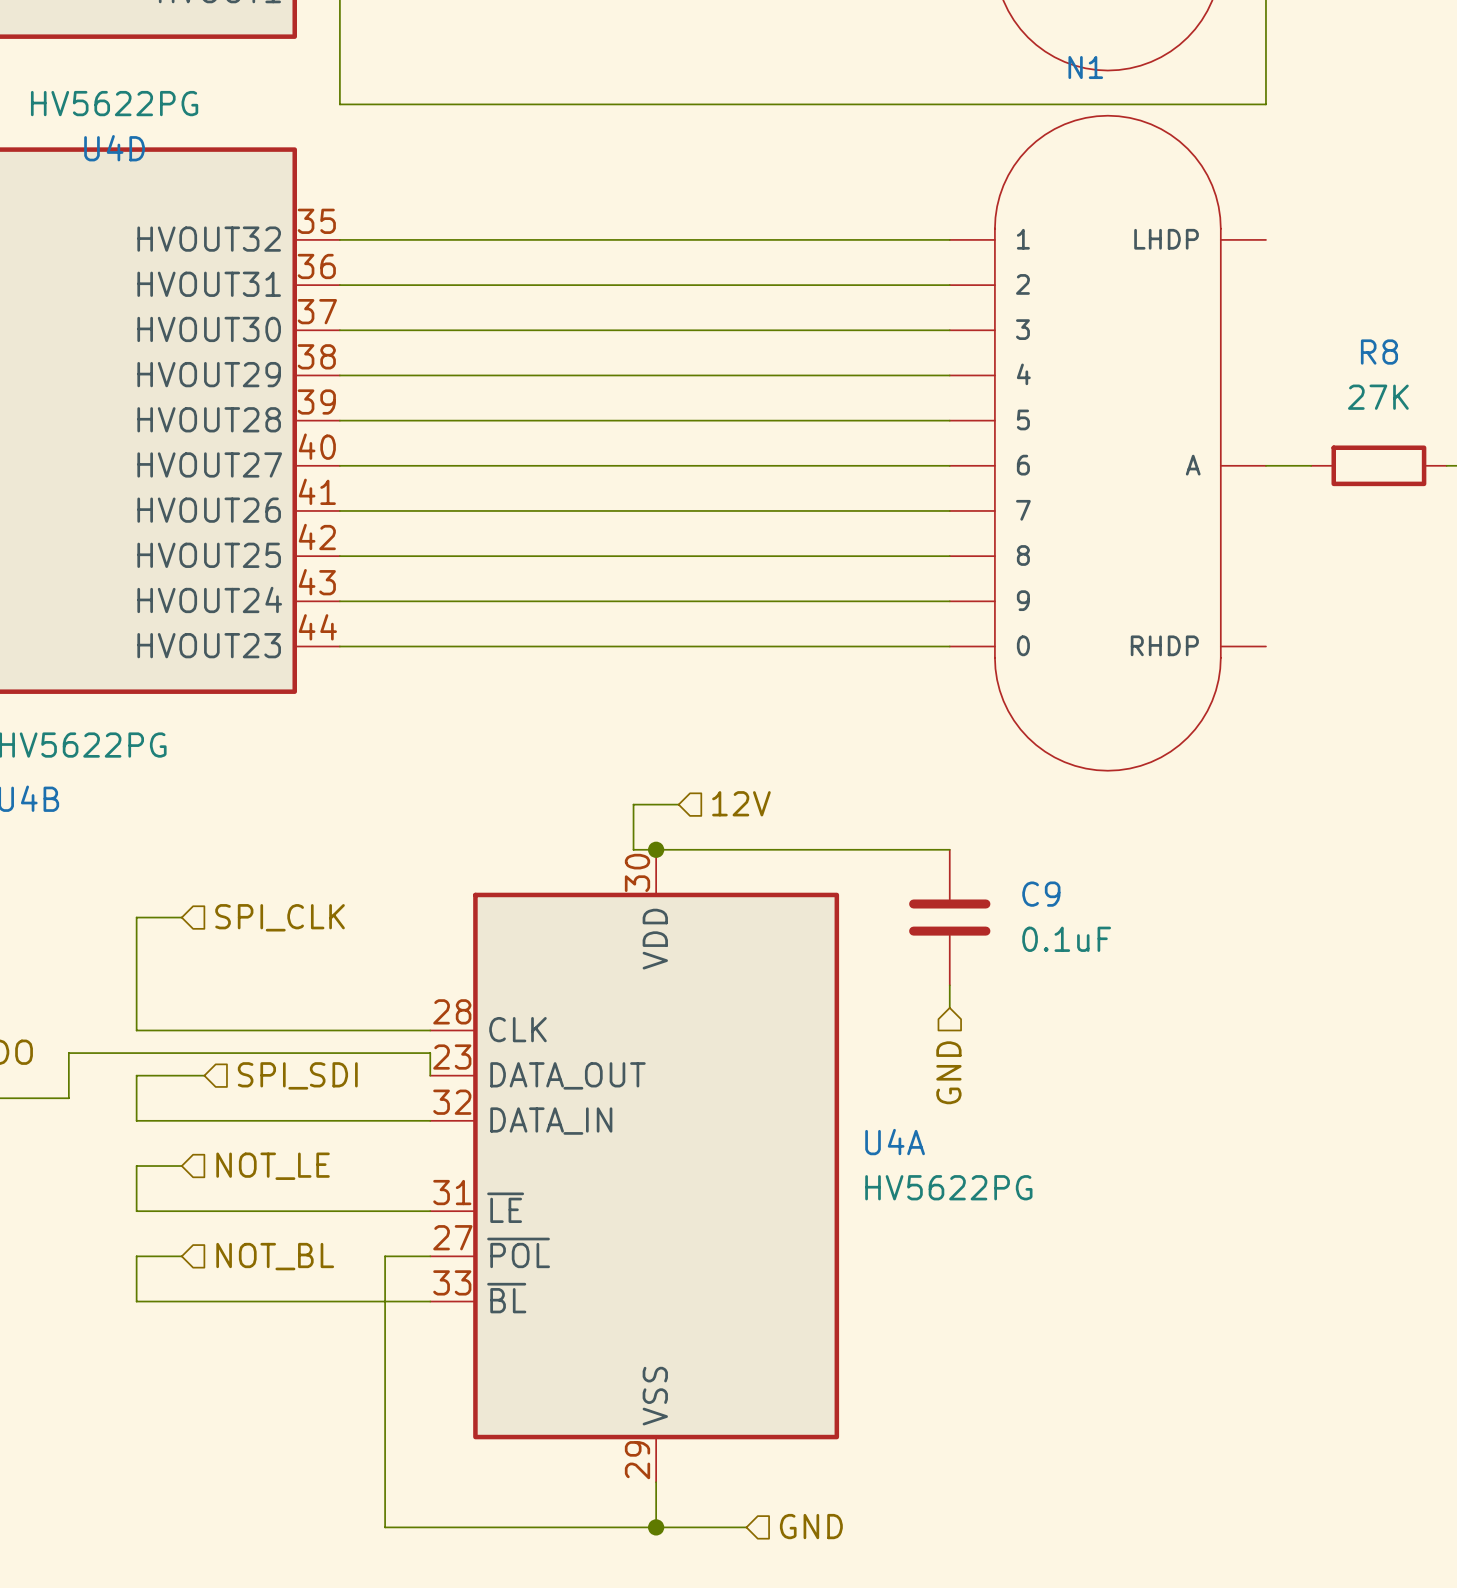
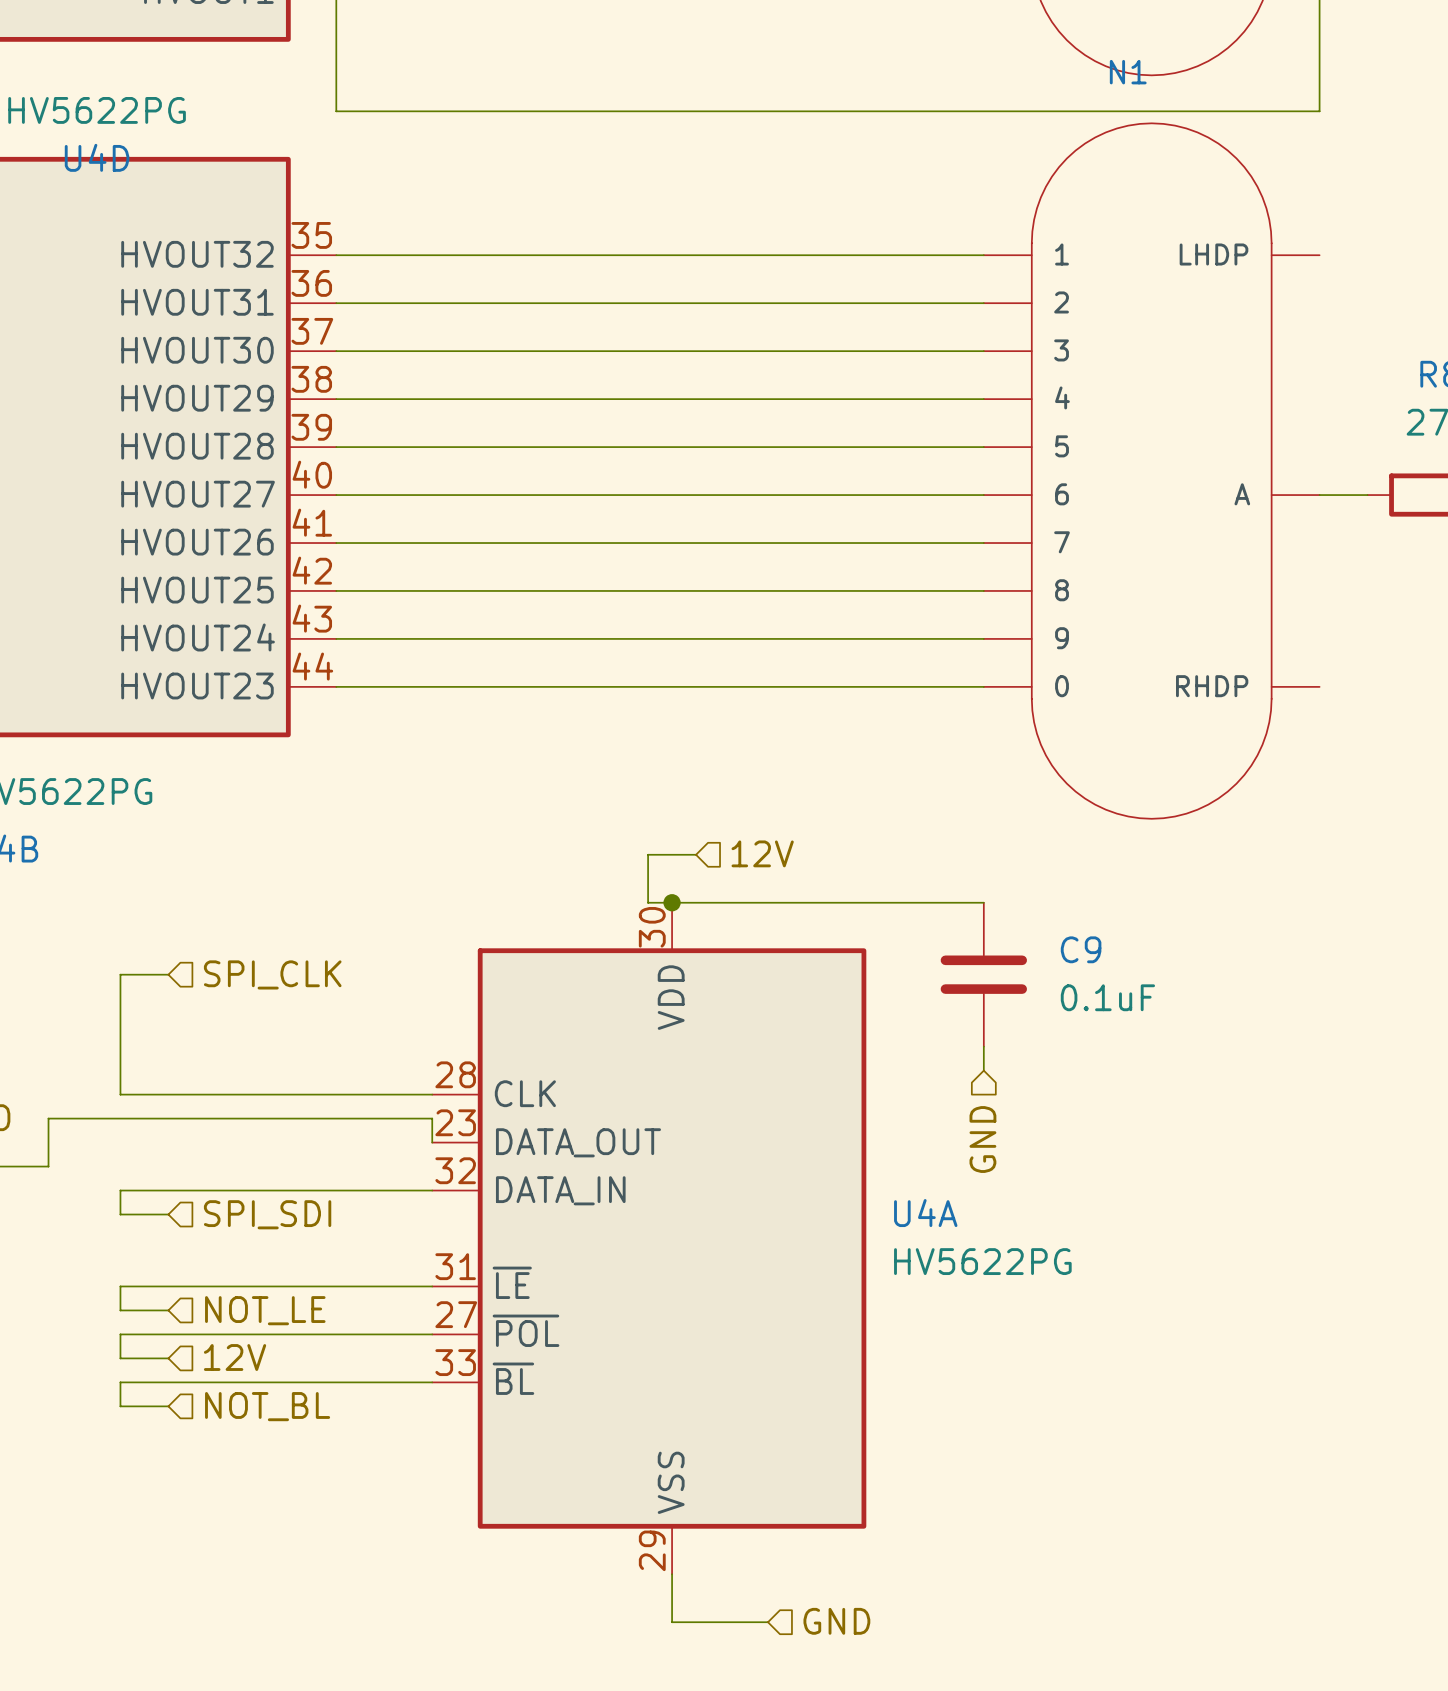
wire: (204, 1075) (136, 1075) (136, 1120) -> (168, 1214) (120, 1214) (120, 1190)
hierarchical label position: SPI_SDI (297, 1075) -> SPI_SDI (267, 1214)
wire: (181, 1166) (136, 1166) (136, 1211) -> (168, 1310) (120, 1310) (120, 1286)
hierarchical label position: NOT_LE (273, 1166) -> NOT_LE (265, 1310)
hierarchical label position: NOT_BL (275, 1256) -> NOT_BL (267, 1406)
wire: (385, 1256) (385, 1527) (656, 1527) -> (384, 1334) (168, 1334)
wire: (136, 1278) (136, 1301) -> (120, 1358) (168, 1358)
hierarchical label: none -> 12V (235, 1357)
wire: none -> (120, 1382) (120, 1406) (168, 1406)
junction: (656, 1527) -> none

